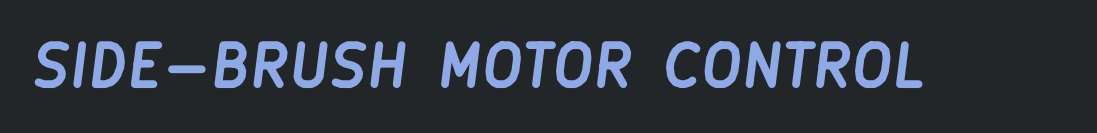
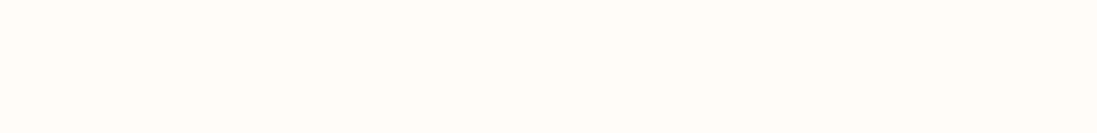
text: SIDE-BRUSH MOTOR CONTROL (478, 64) -> none

